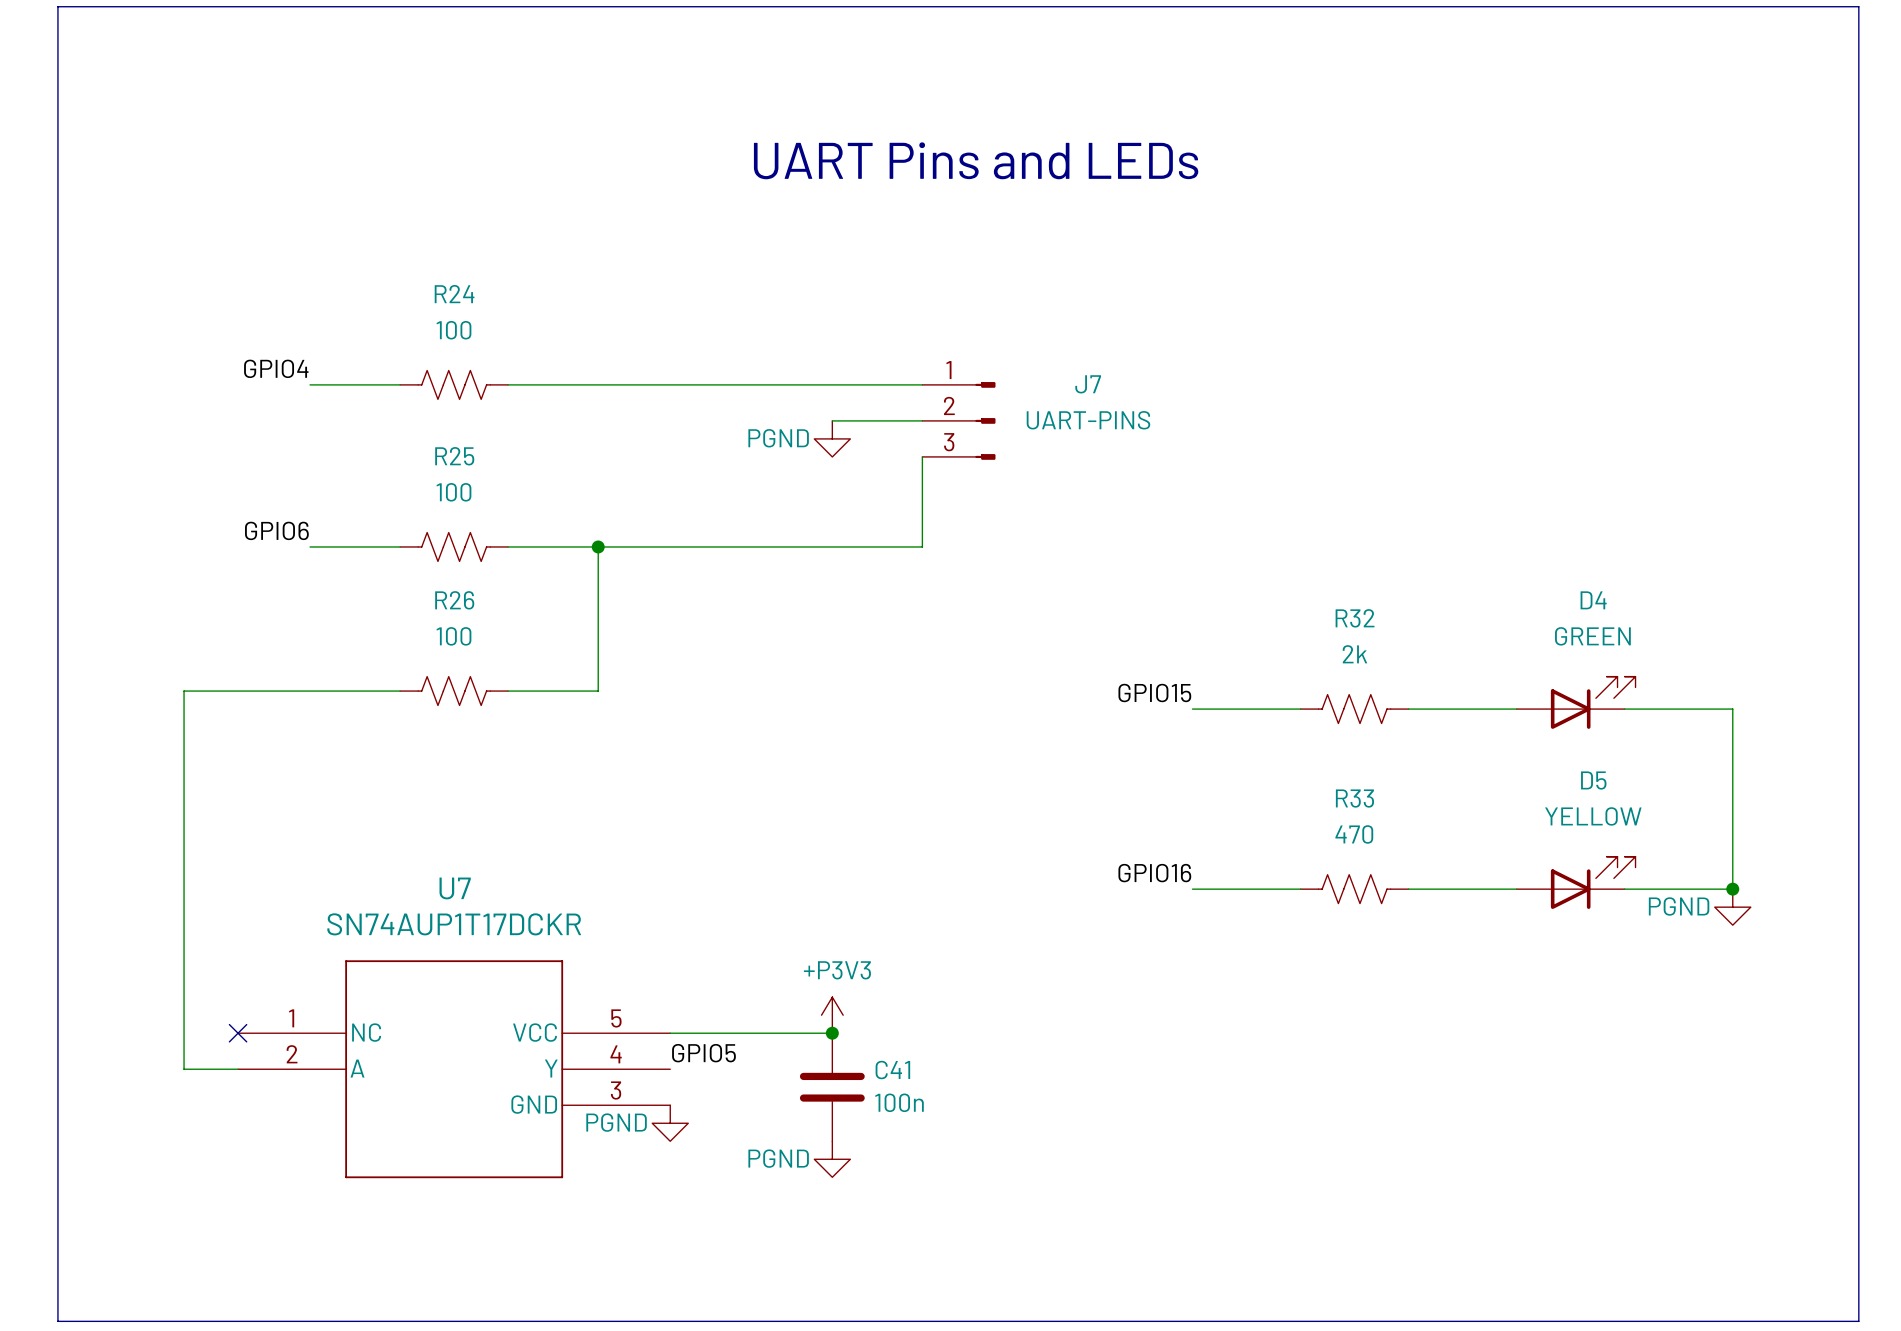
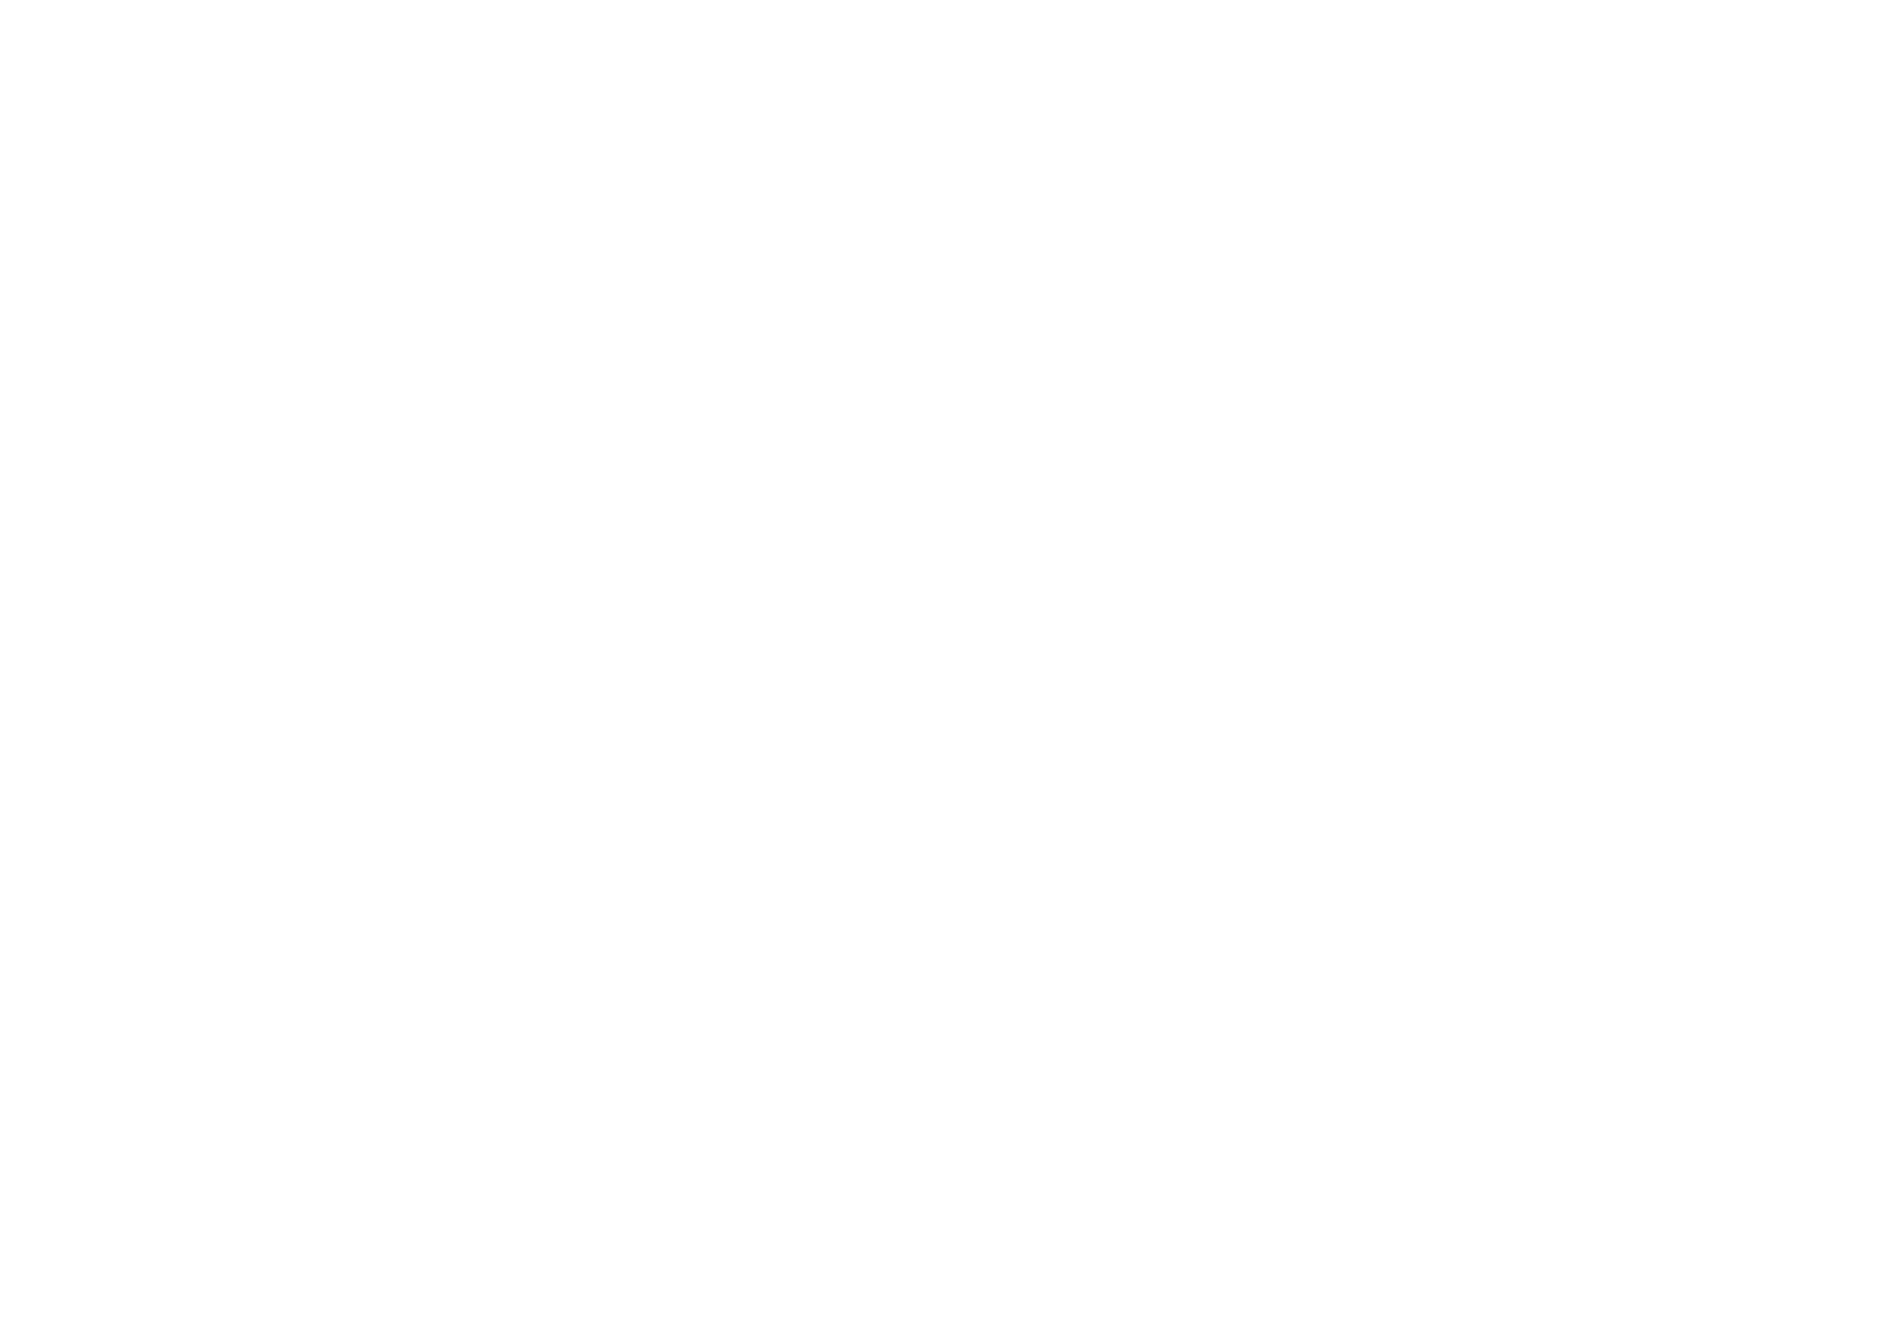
line: (57, 6) (1858, 6) (1858, 1321) (57, 1321) (57, 6) -> none
text: UART Pins and LEDs (976, 160) -> none
label: GPIO4 (276, 368) -> none
wire: (310, 384) (400, 384) -> none
R24: 100 (454, 384) -> none
wire: (508, 384) (922, 384) -> none
wire: (832, 420) (922, 420) -> none
J7: UART-PINS (958, 420) -> none
power symbol: PGND (832, 438) -> none
wire: (922, 456) (922, 546) (508, 546) -> none
label: GPIO6 (276, 530) -> none
wire: (310, 546) (400, 546) -> none
R25: 100 (454, 546) -> none
wire: (598, 546) (598, 691) (508, 691) -> none
junction: (598, 546) -> none
wire: (400, 691) (184, 691) (184, 1069) (238, 1069) -> none
R26: 100 (454, 691) -> none
label: GPIO15 (1154, 692) -> none
D4: GREEN (1576, 702) -> none
wire: (1192, 709) (1300, 709) -> none
R32: 2k (1354, 709) -> none
wire: (1408, 709) (1516, 709) -> none
wire: (1624, 709) (1732, 709) (1732, 889) (1624, 889) -> none
label: GPIO16 (1154, 873) -> none
D5: YELLOW (1576, 882) -> none
wire: (1192, 889) (1300, 889) -> none
R33: 470 (1354, 889) -> none
wire: (1408, 889) (1516, 889) -> none
junction: (1732, 889) -> none
power symbol: PGND (1732, 907) -> none
power symbol: +P3V3 (832, 1015) -> none
no-connect mark: (238, 1033) -> none
wire: (670, 1033) (832, 1033) -> none
junction: (832, 1033) -> none
label: GPIO5 (703, 1053) -> none
U7: SN74AUP1T17DCKR (454, 1069) -> none
C41: 100n (832, 1087) -> none
power symbol: PGND (670, 1123) -> none
power symbol: PGND (832, 1159) -> none

